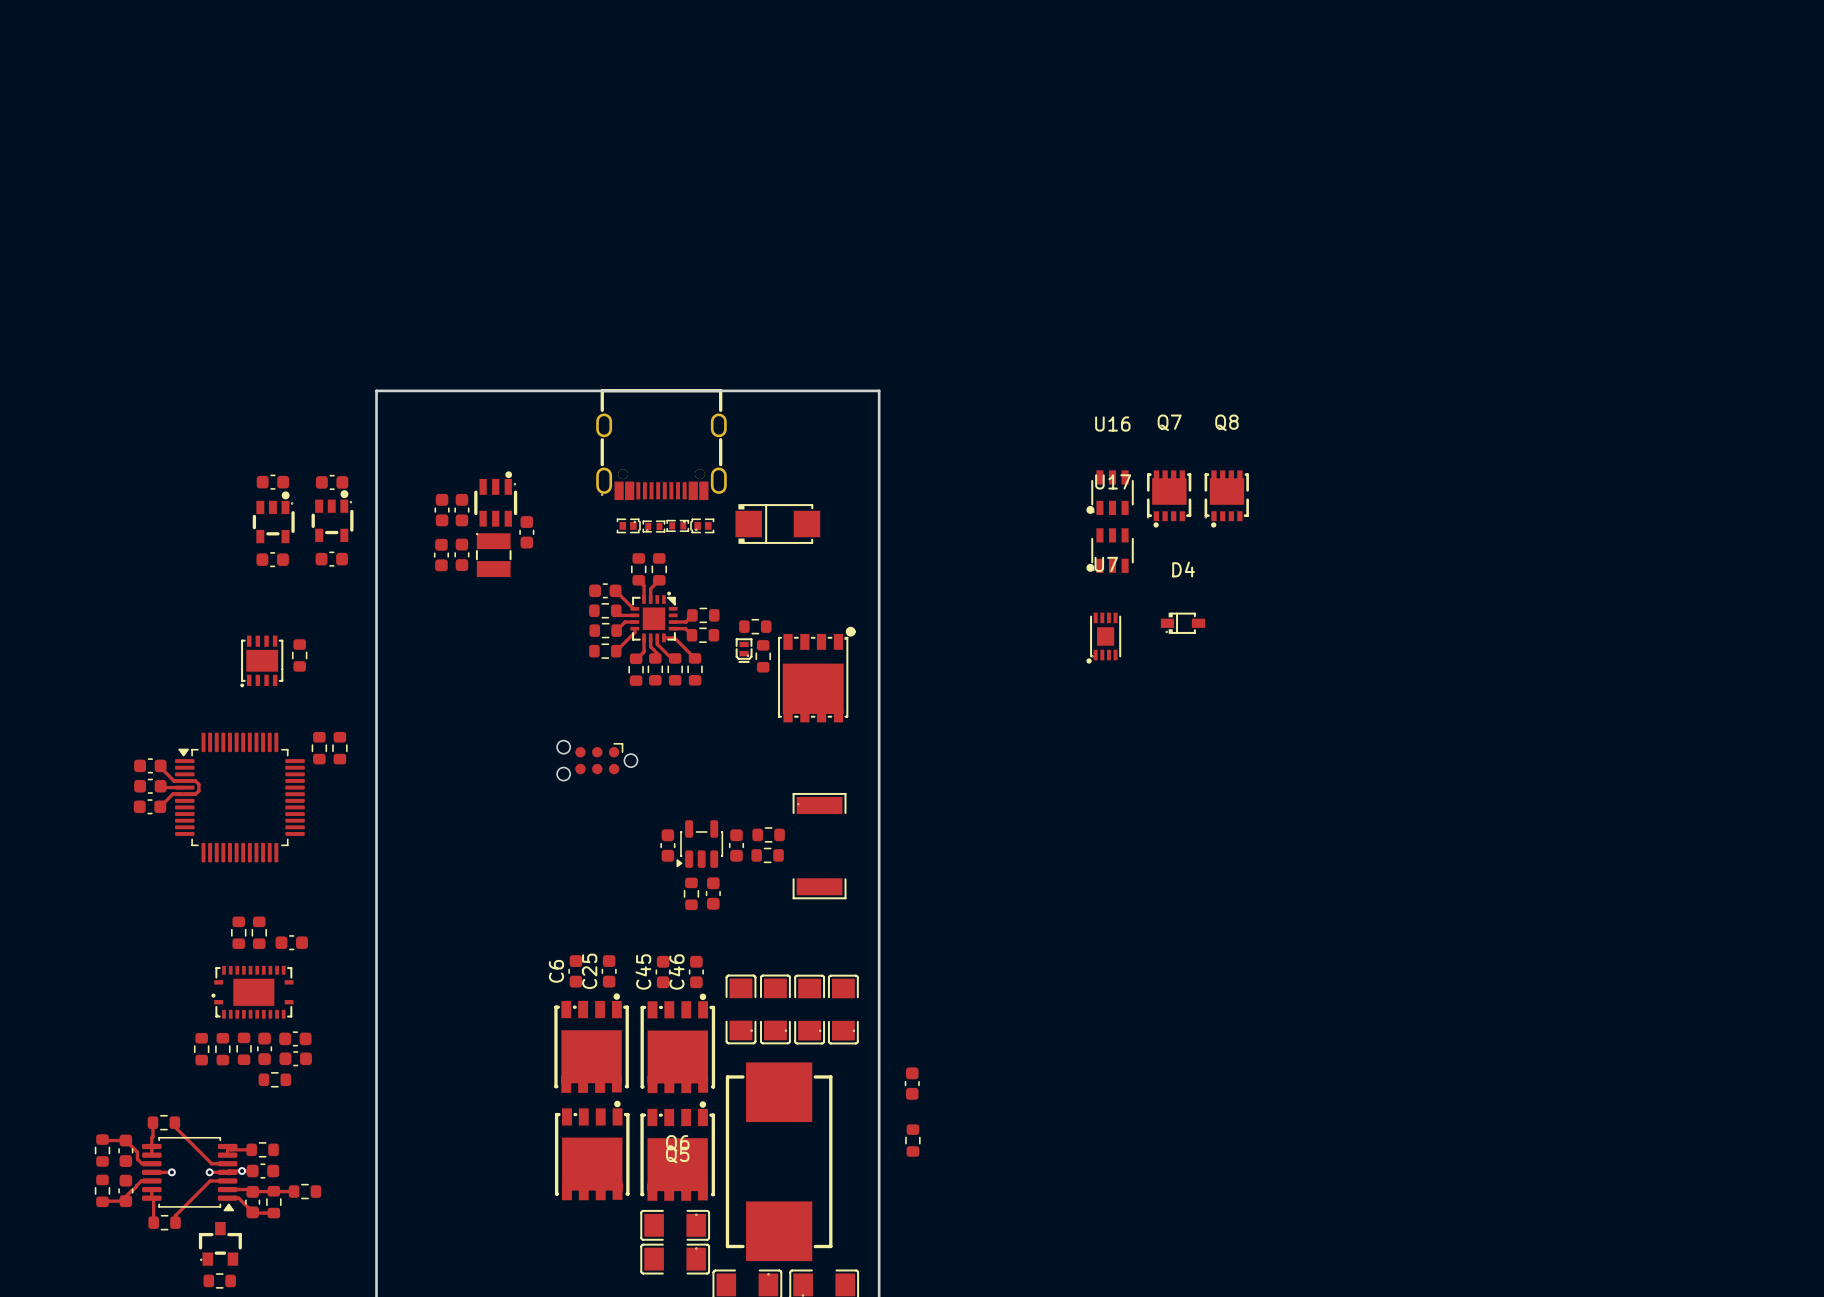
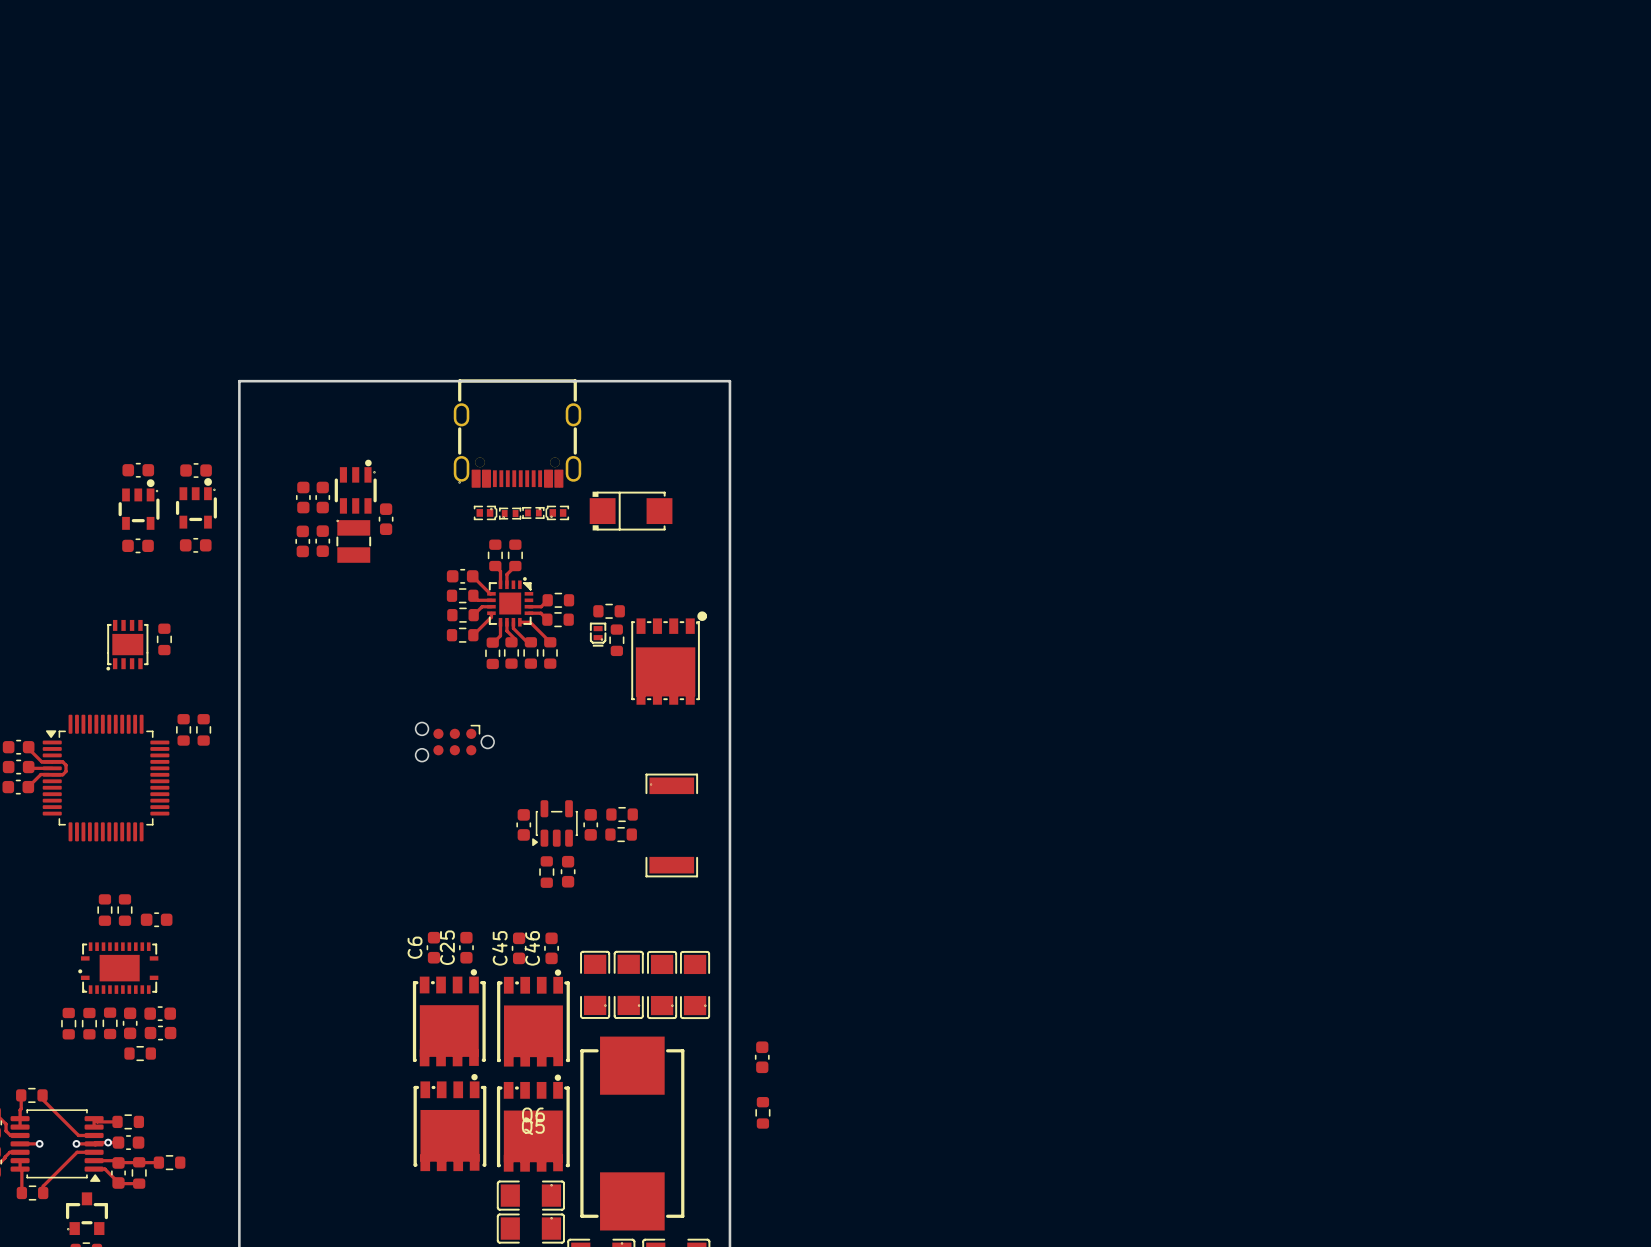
U16: (1110, 492) -> none
Q7: (1169, 498) -> none
Q8: (1226, 498) -> none
U17: (1110, 550) -> none
D4: (1182, 623) -> none
U7: (1103, 638) -> none

